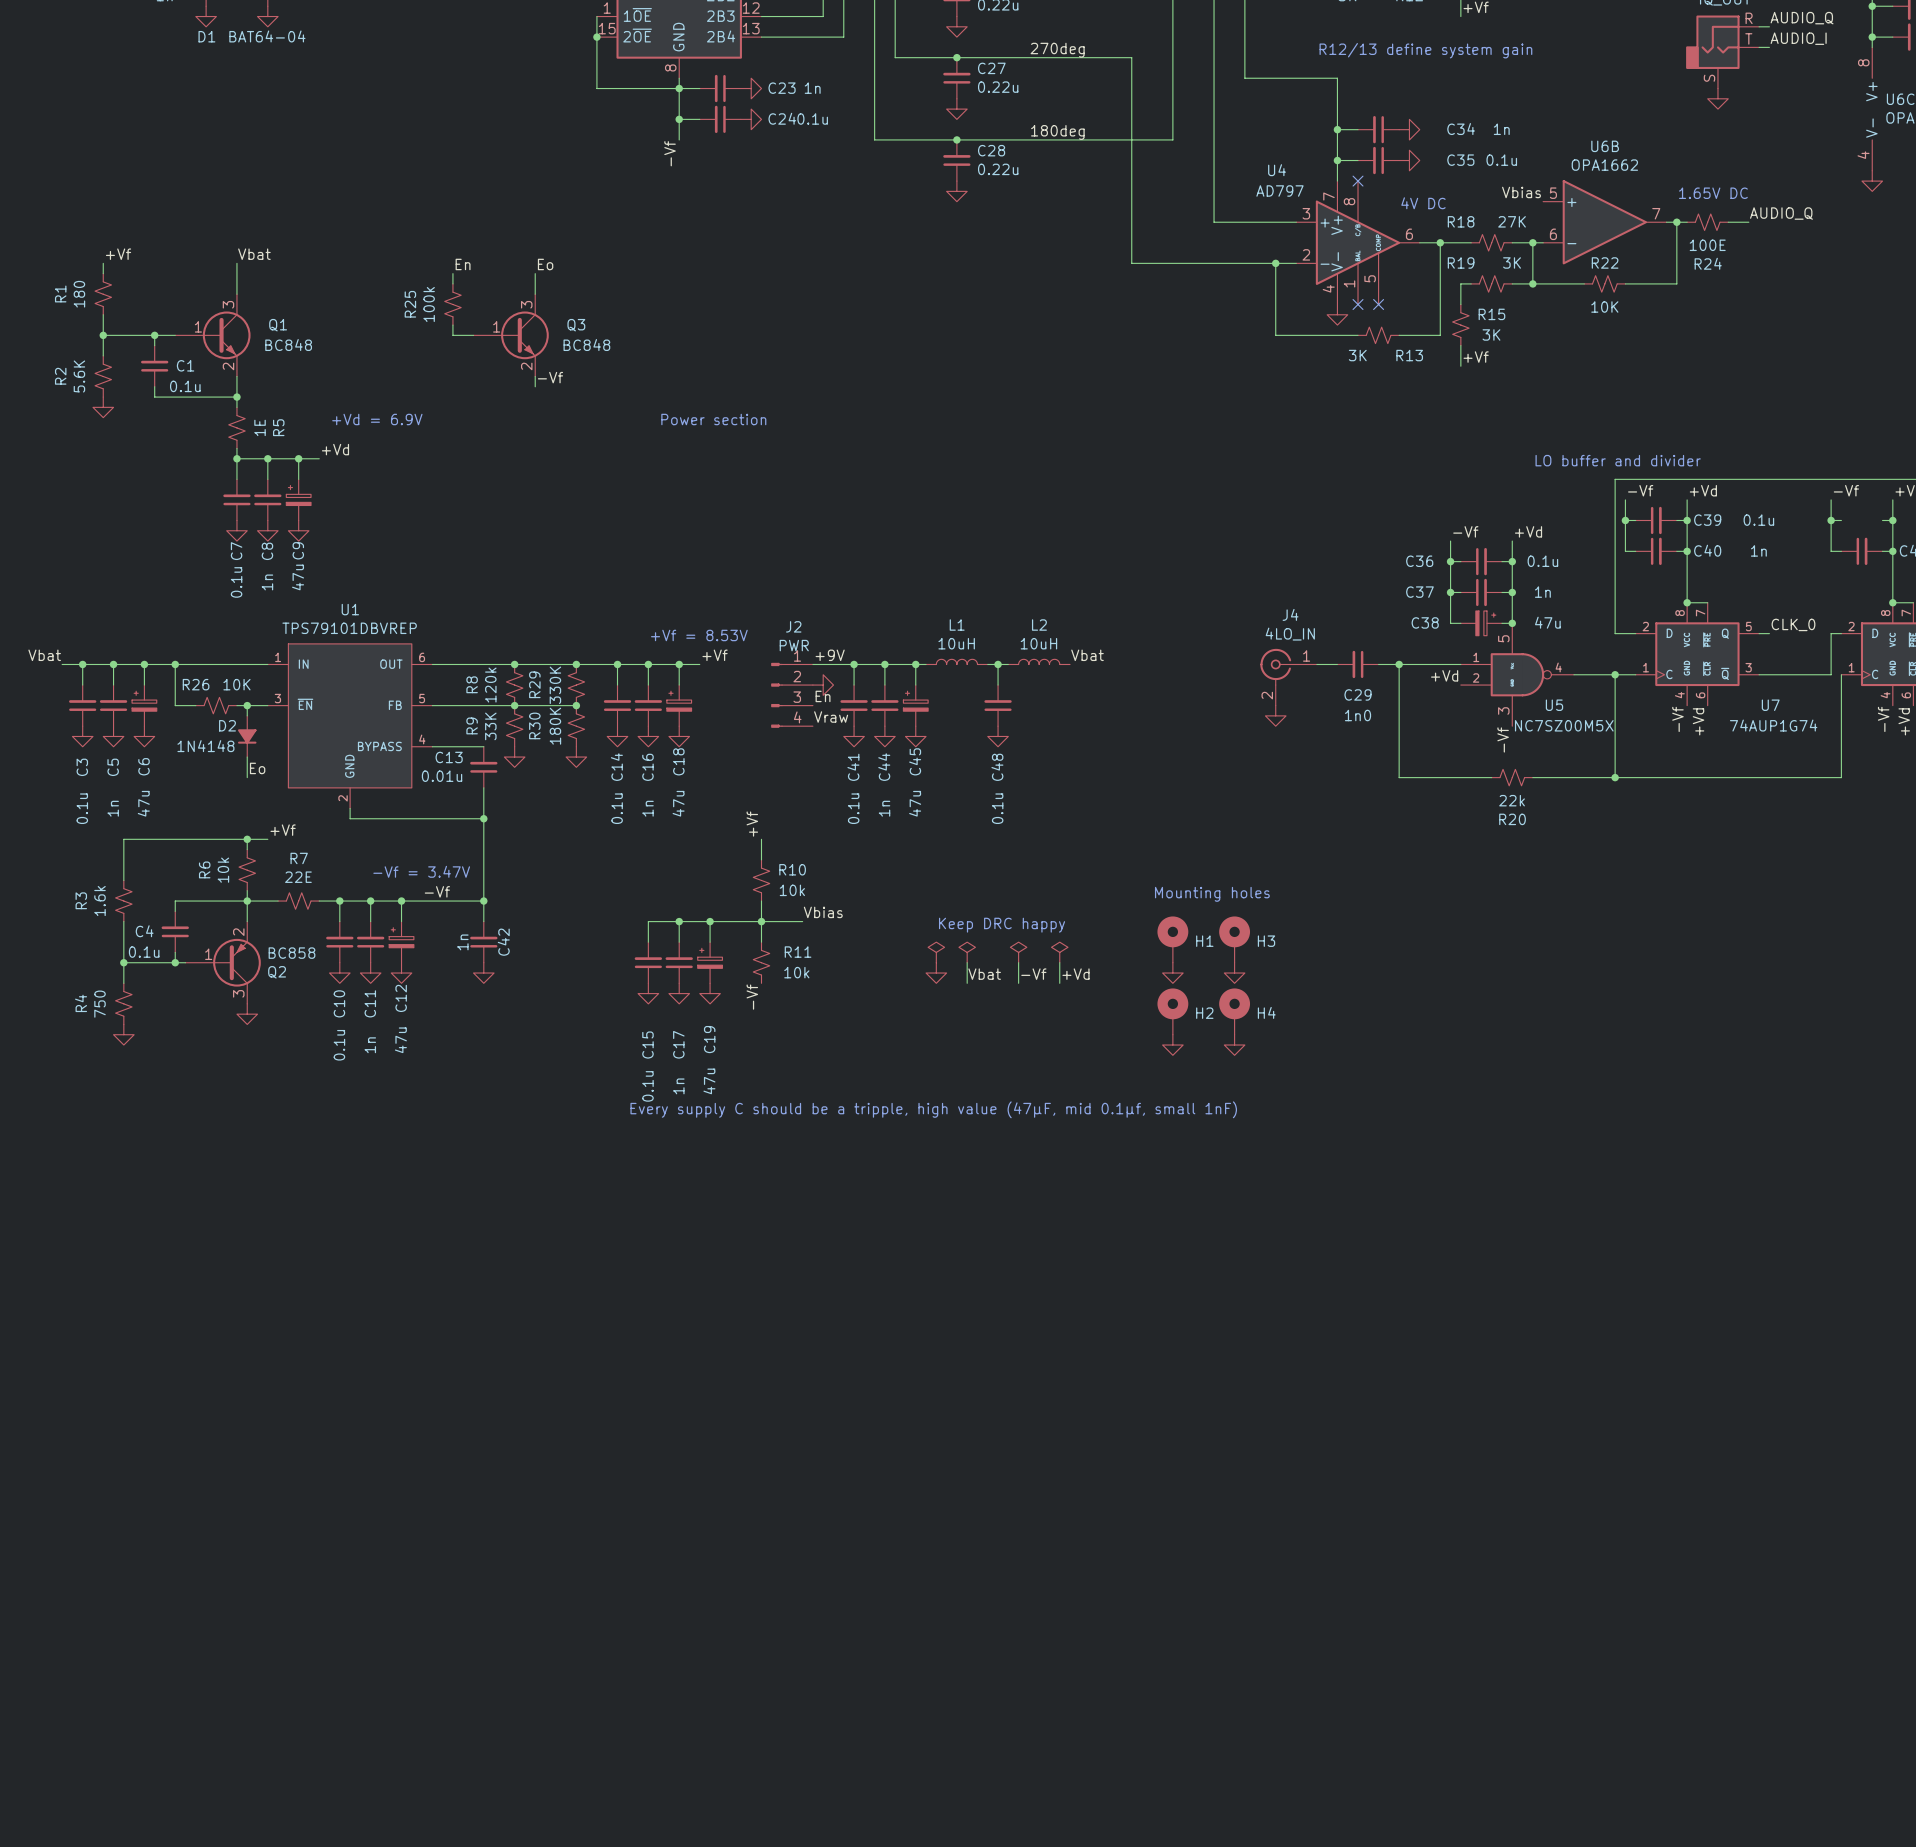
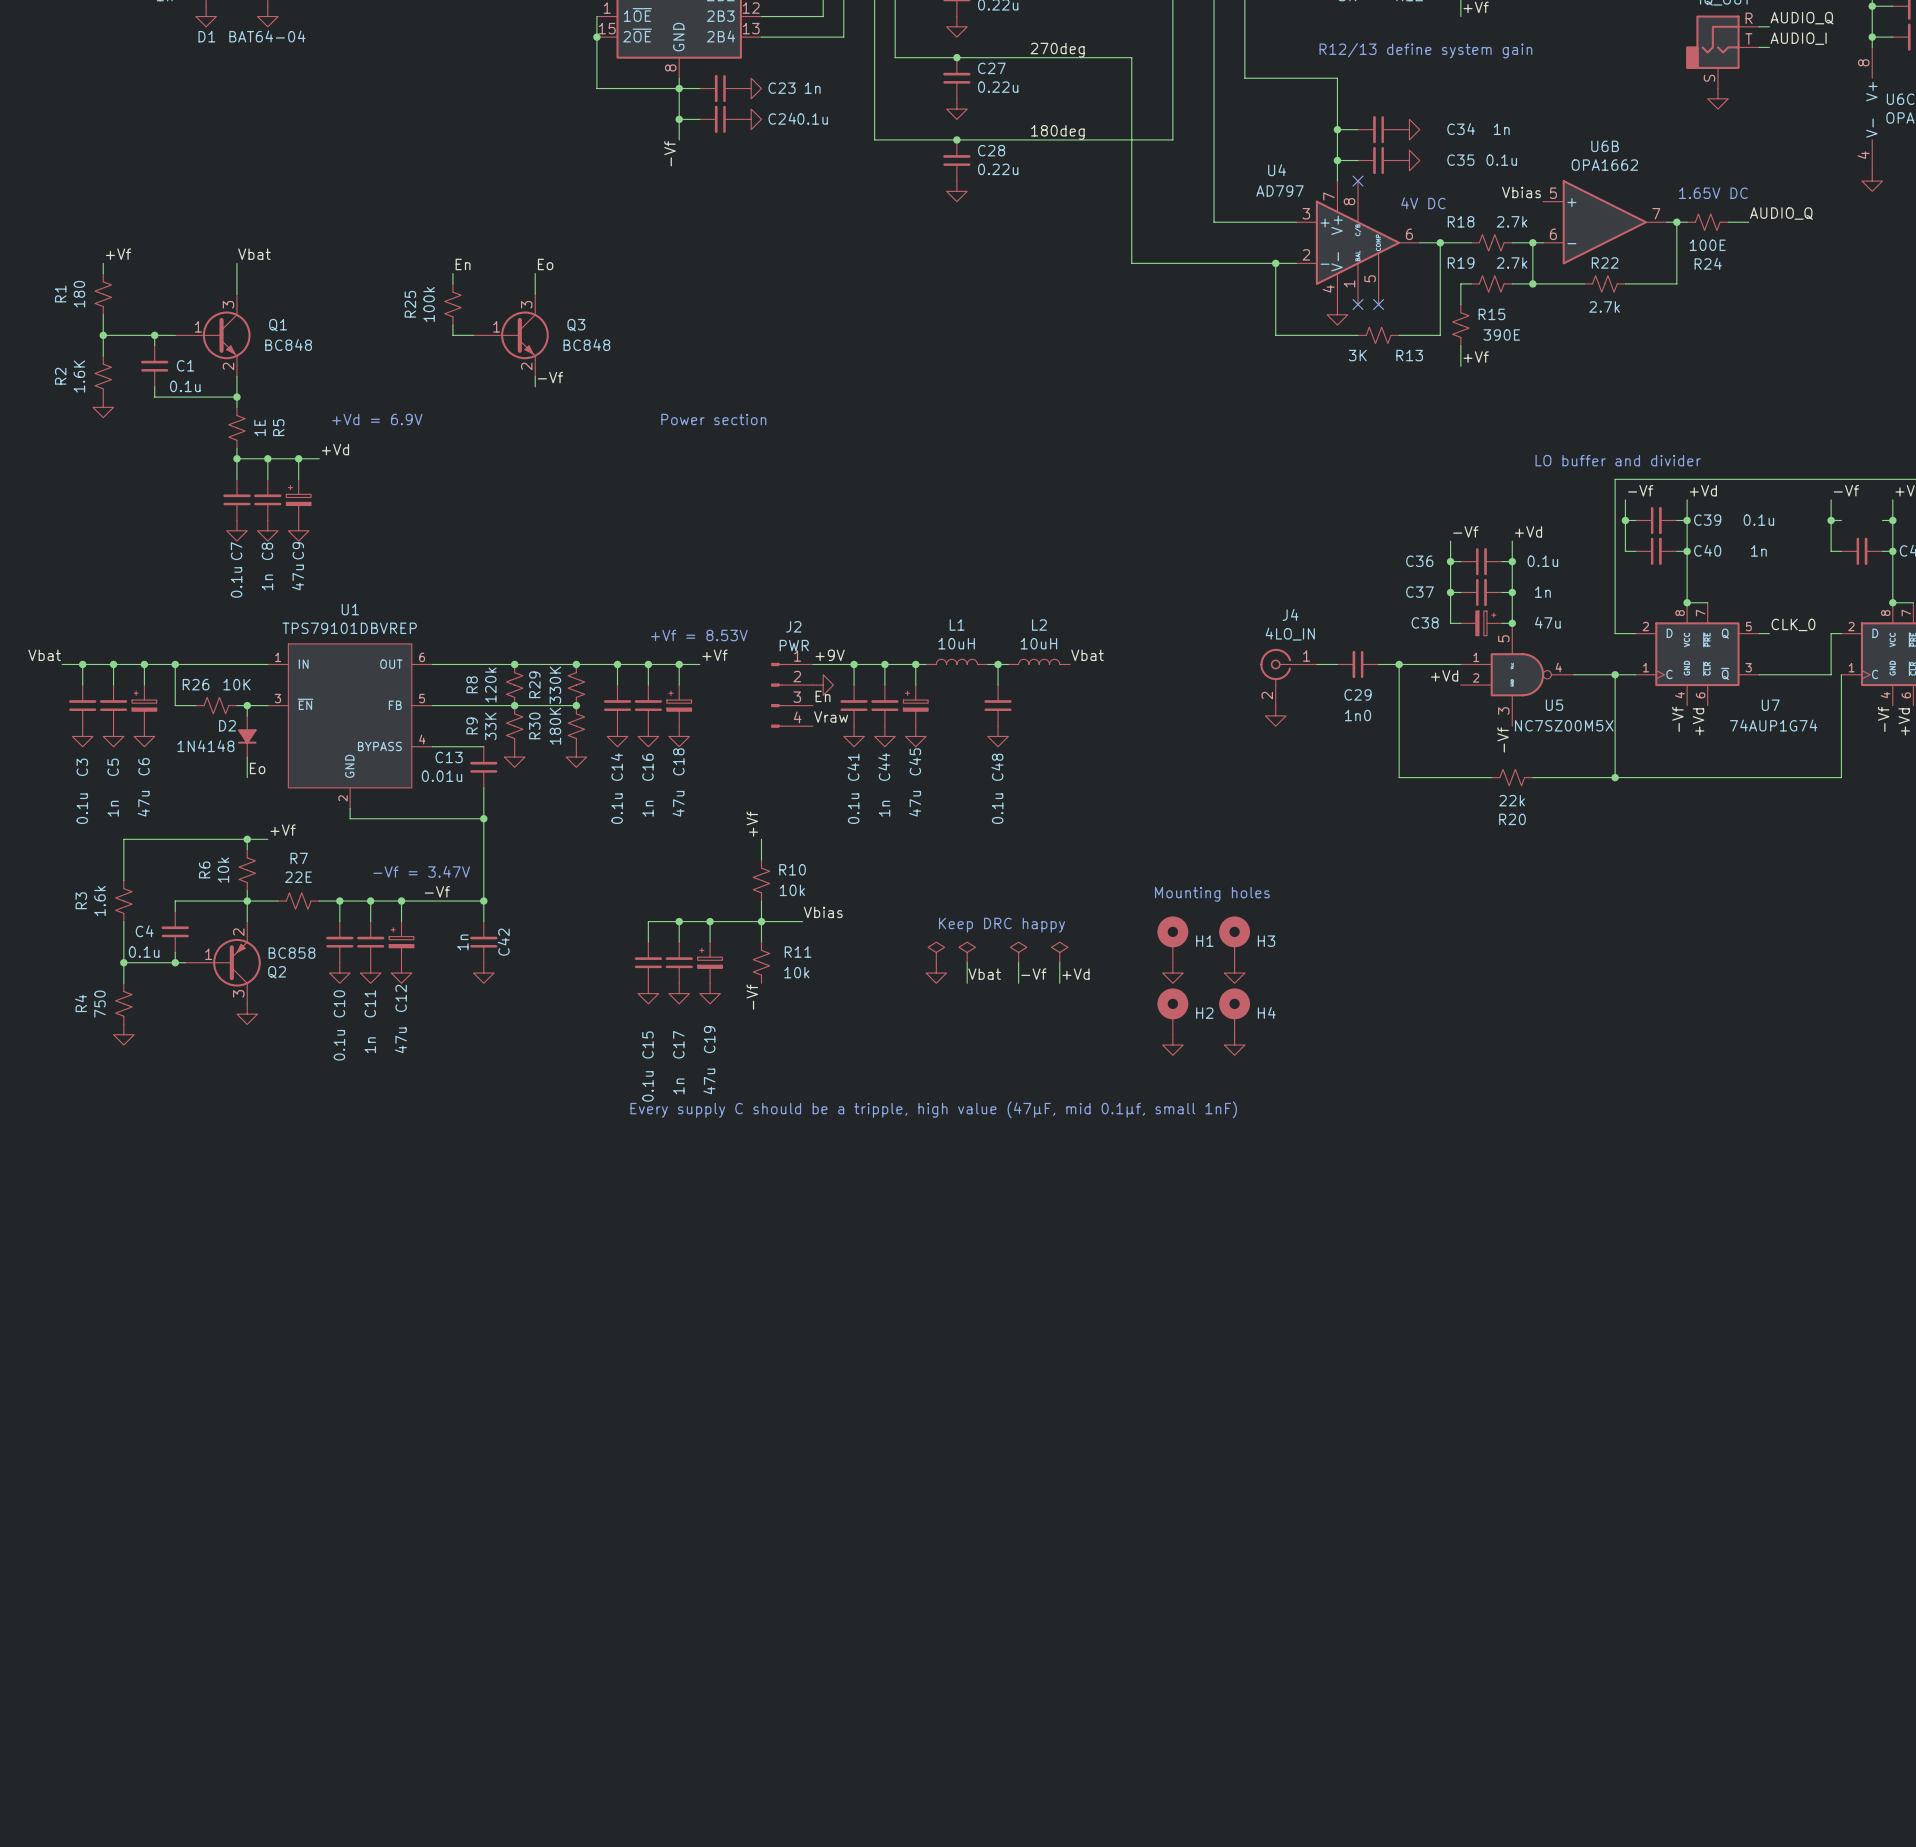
R18 value: 27K (1512, 221) -> 2.7k (1512, 221)
R19 value: 3K (1512, 262) -> 2.7k (1512, 262)
R22 value: 10K (1604, 307) -> 2.7k (1604, 307)
R15 value: 3K (1491, 334) -> 390E (1501, 334)
R2 value: 5.6K (79, 376) -> 1.6K (79, 376)

